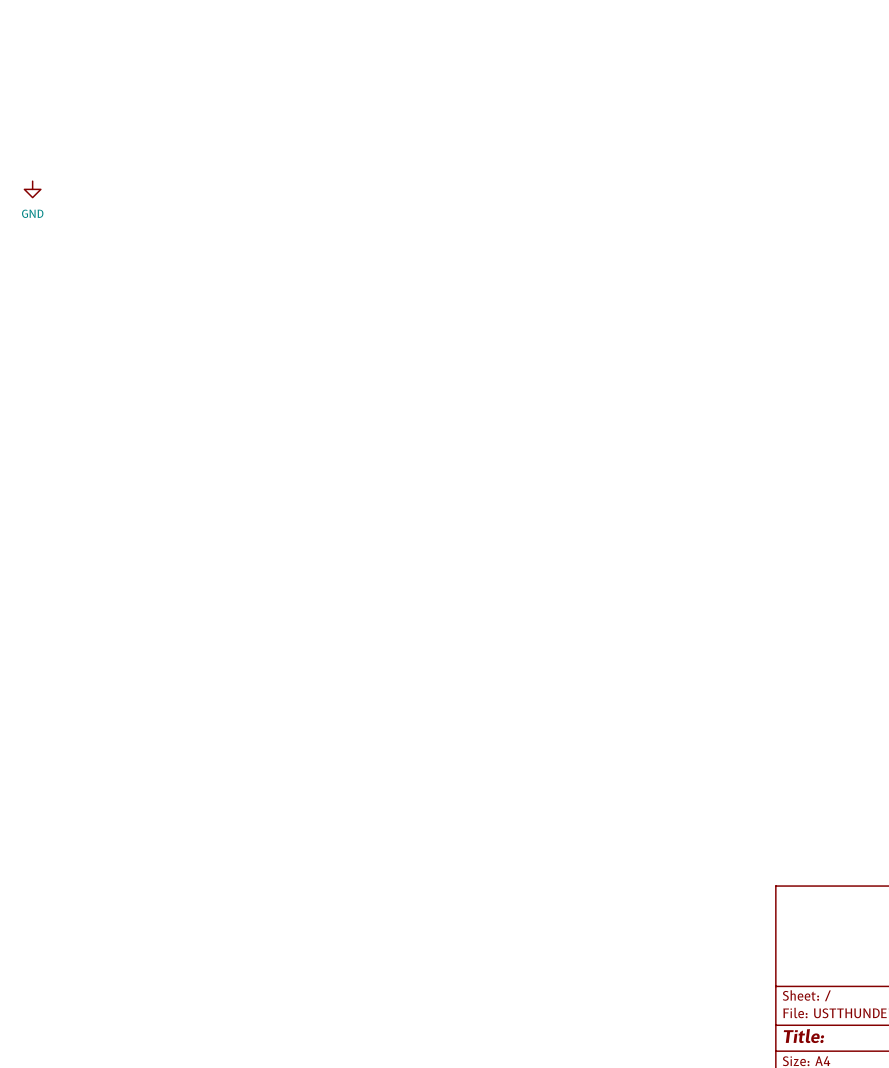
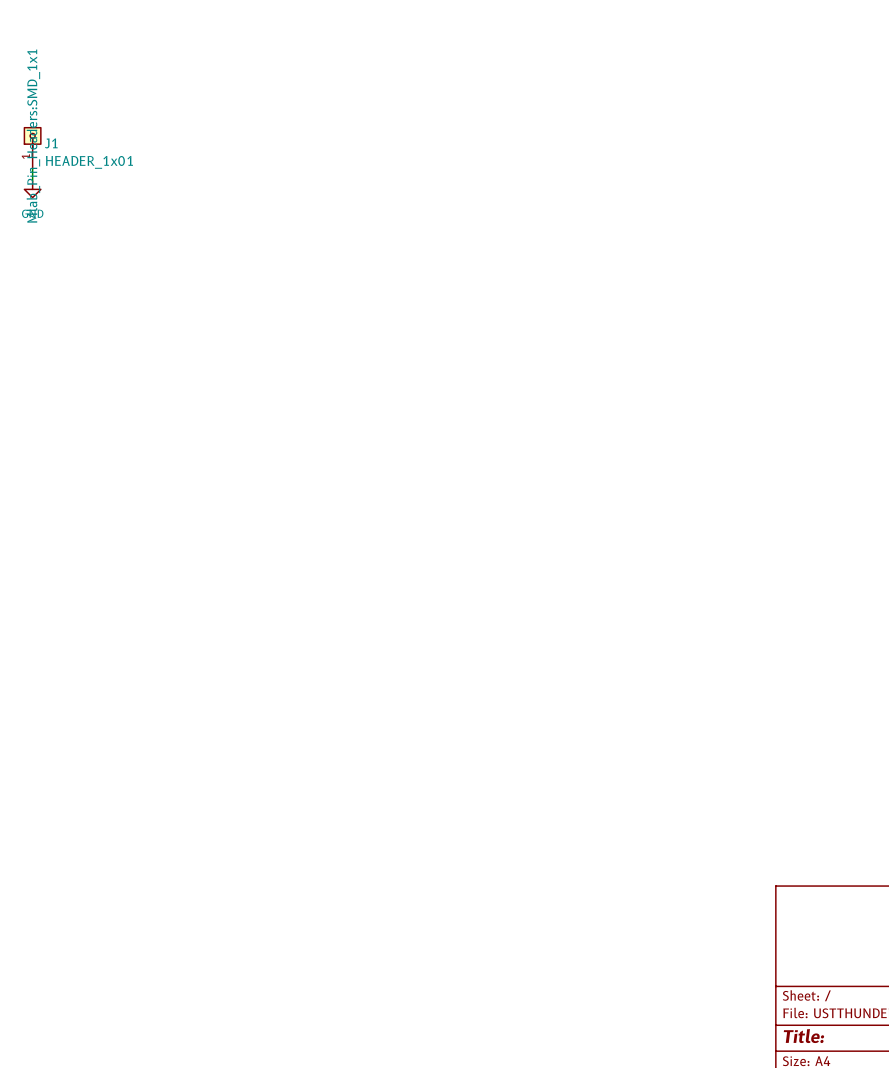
J1: none -> HEADER_1x01 (32, 148)
wire: none -> (32, 168) (32, 181)

